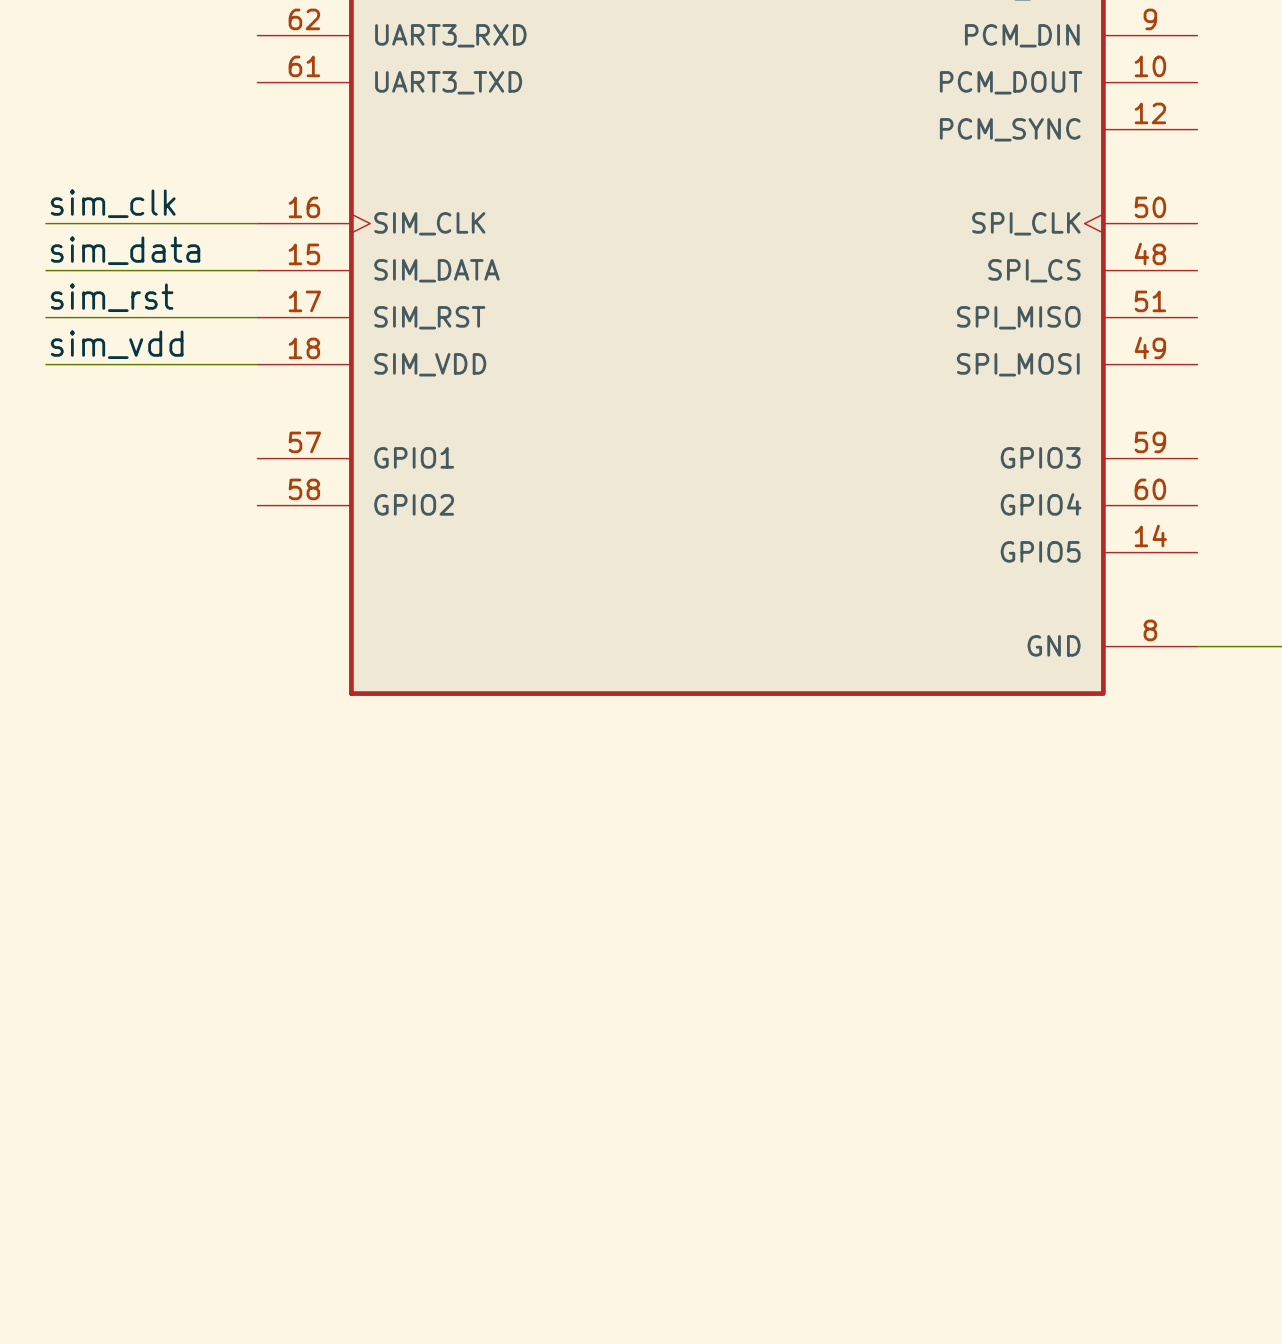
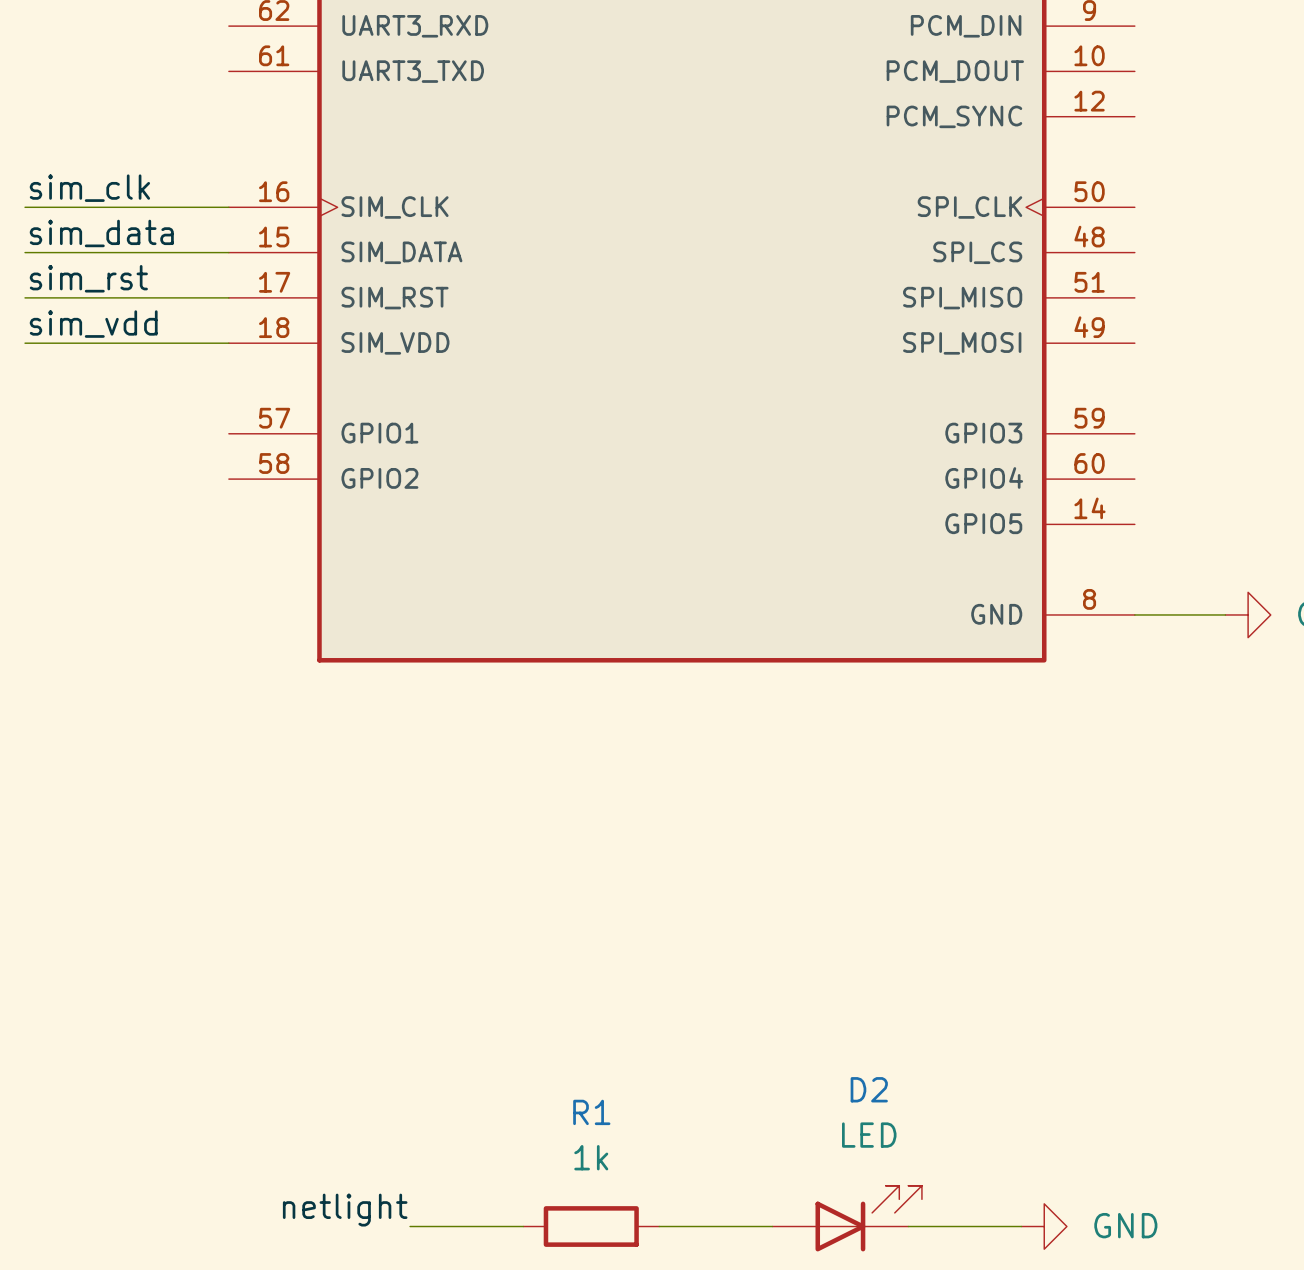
label: none -> netlight (345, 1210)
D2: none -> LED (847, 1218)
wire: none -> (410, 1226) (523, 1226)
R1: none -> 1k (591, 1226)
wire: none -> (659, 1226) (772, 1226)
wire: none -> (908, 1226) (1021, 1226)
power symbol: none -> GND (1044, 1226)

